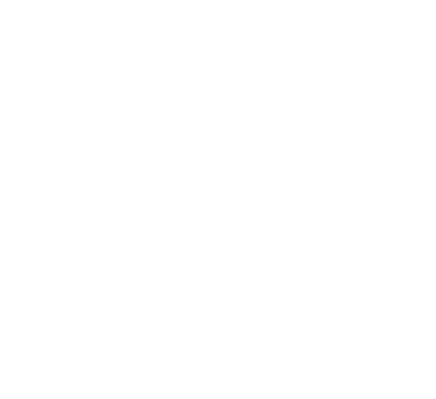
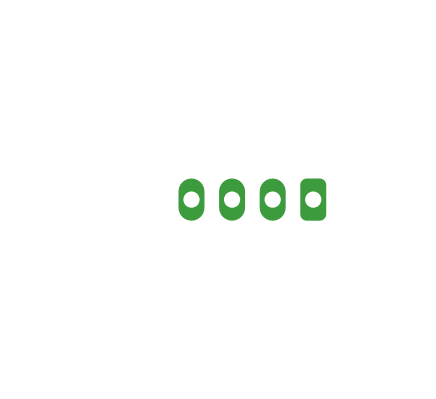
part: none -> (252, 199)

